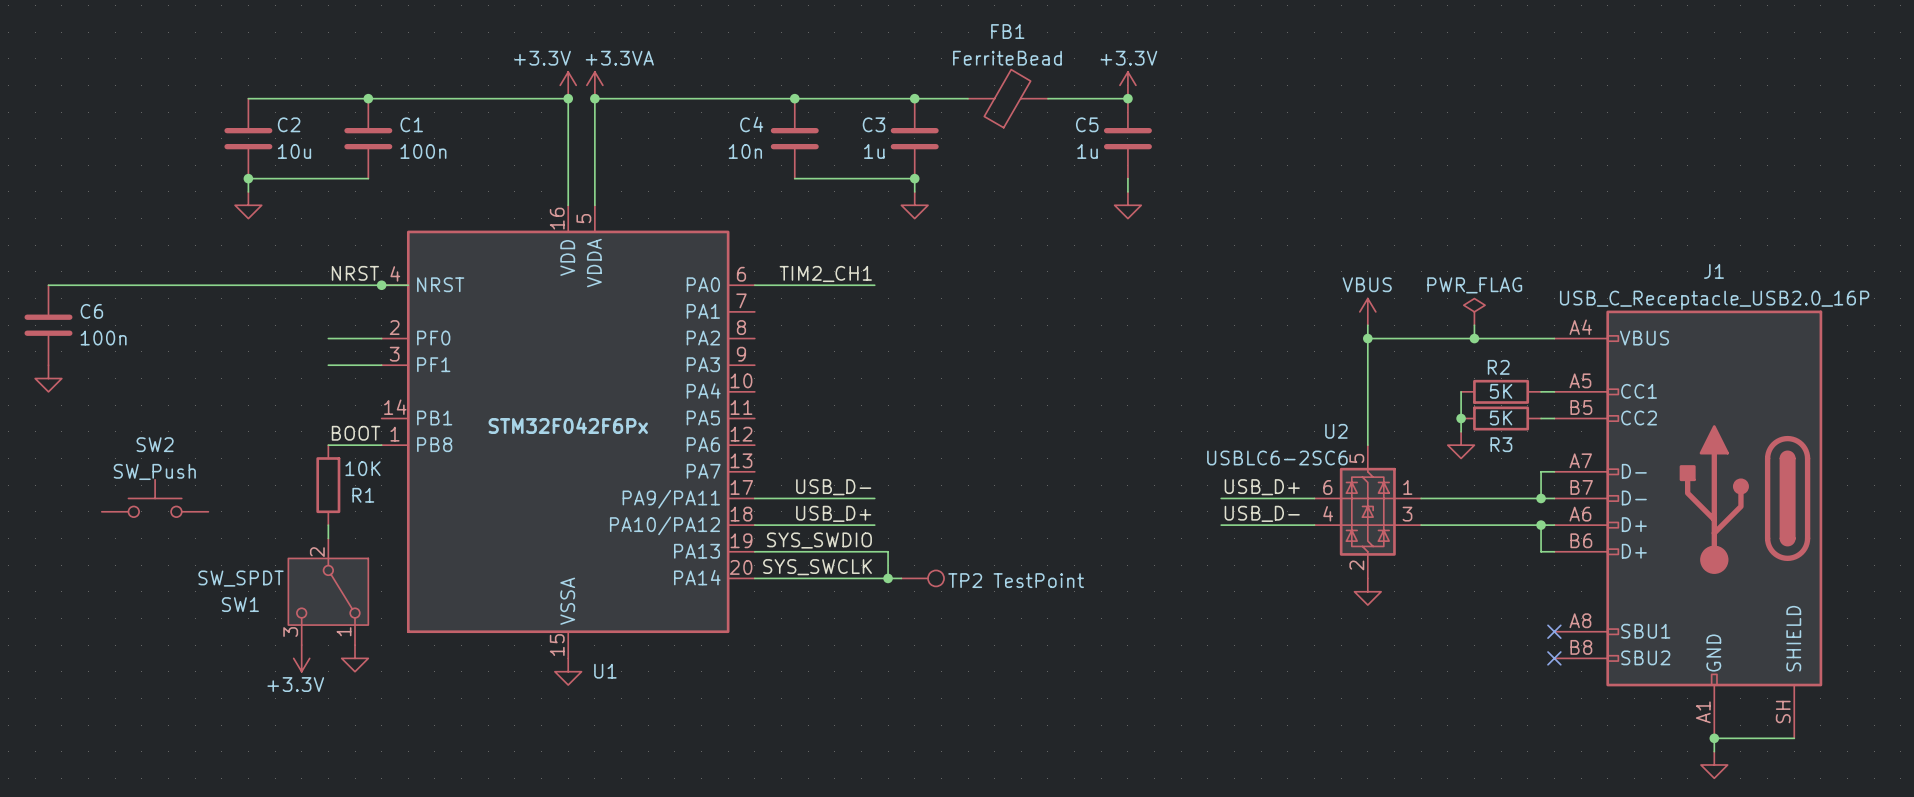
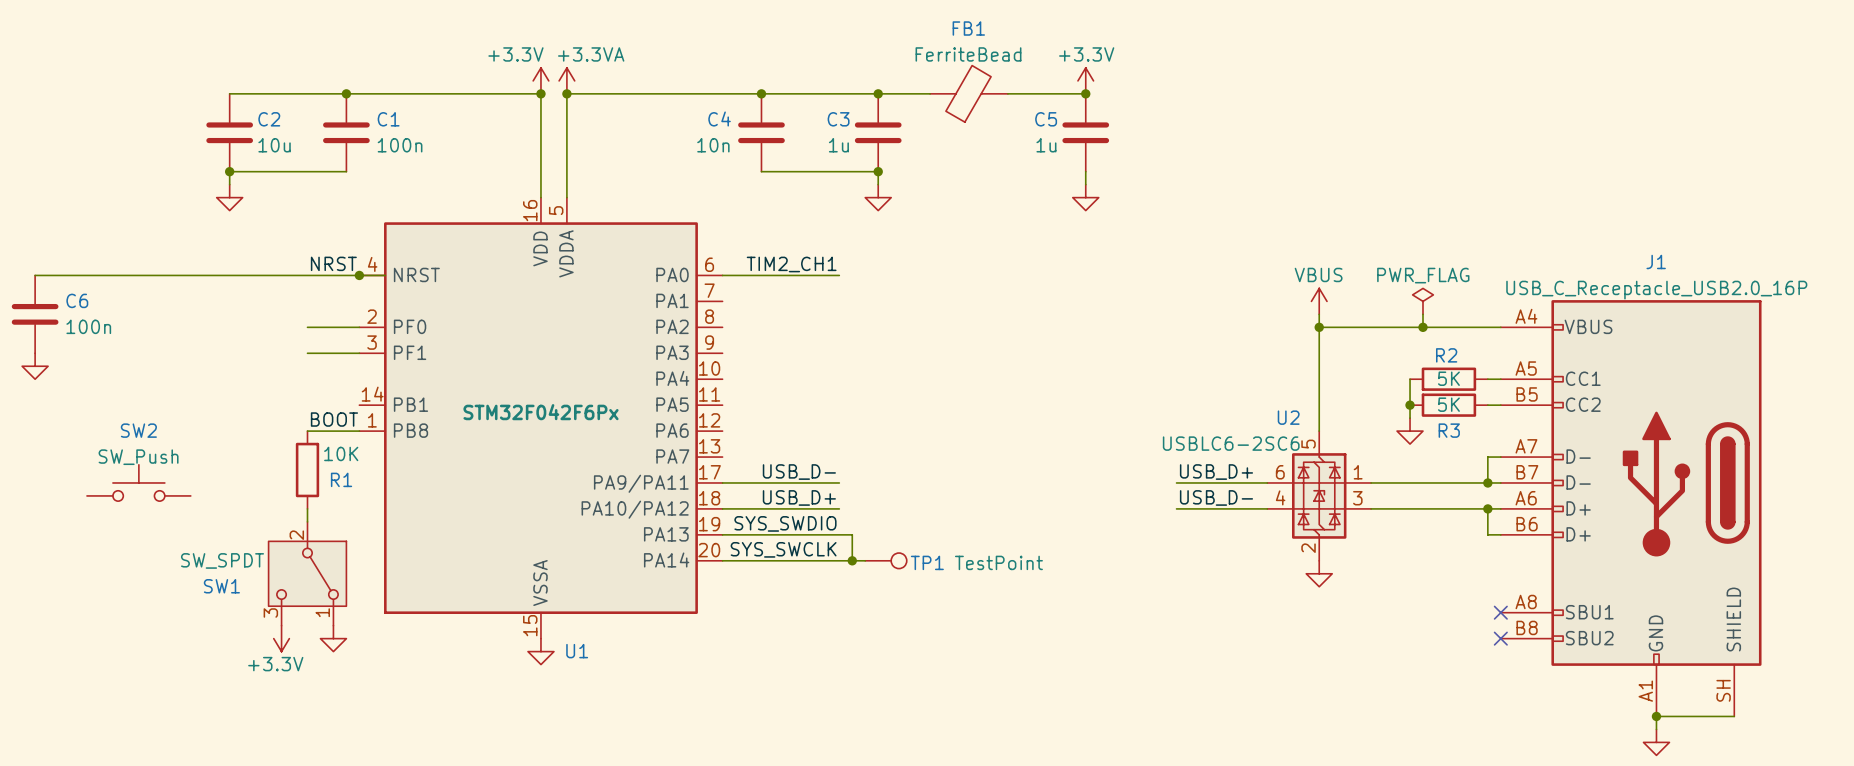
TP2 name: TP2 (965, 580) -> TP1 (927, 562)

